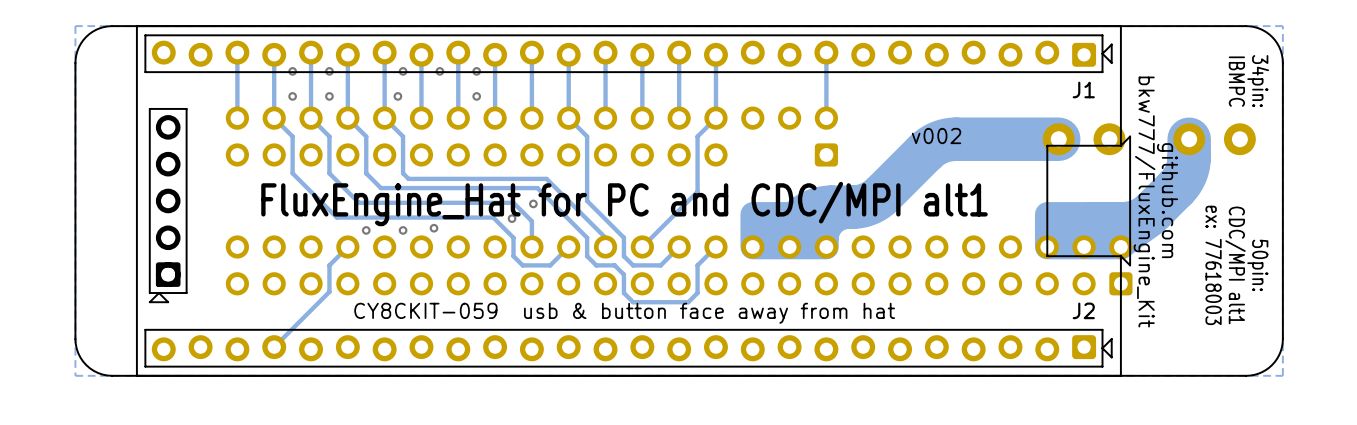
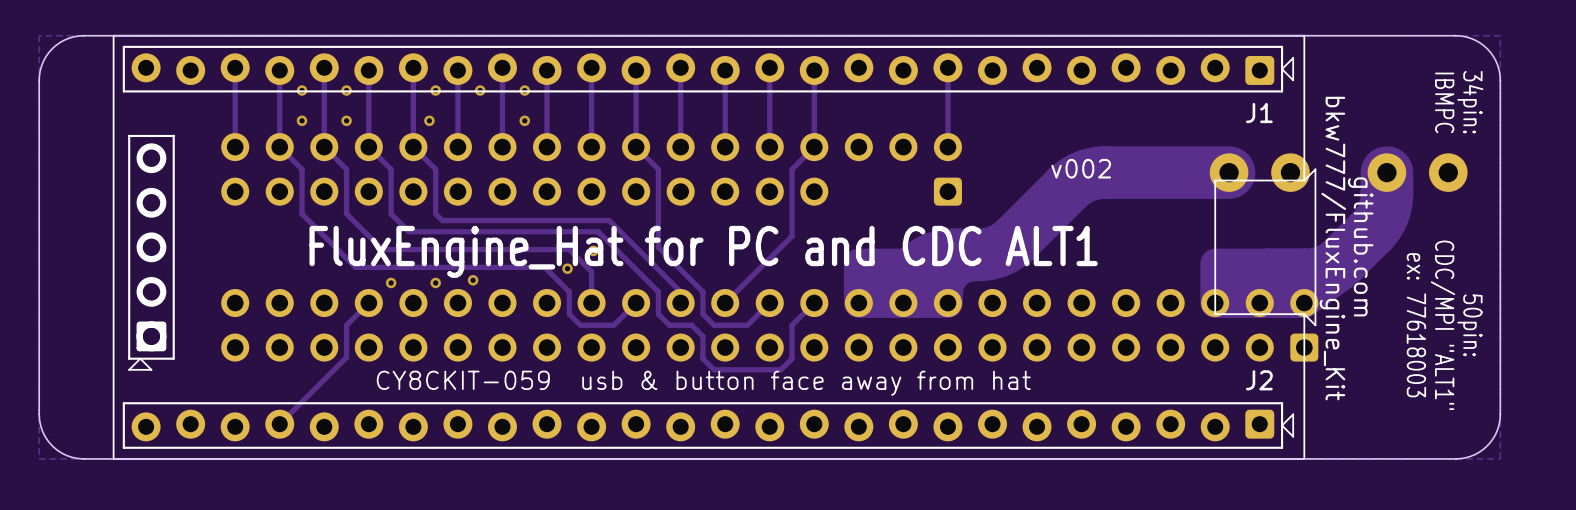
text: FluxEngine_Hat for PC and CDC/MPI alt1 (624, 204) -> FluxEngine_Hat for PC and CDC ALT1 (703, 251)
text: CDC/MPI alt1 (1235, 265) -> CDC/MPI "ALT1" (1442, 325)

